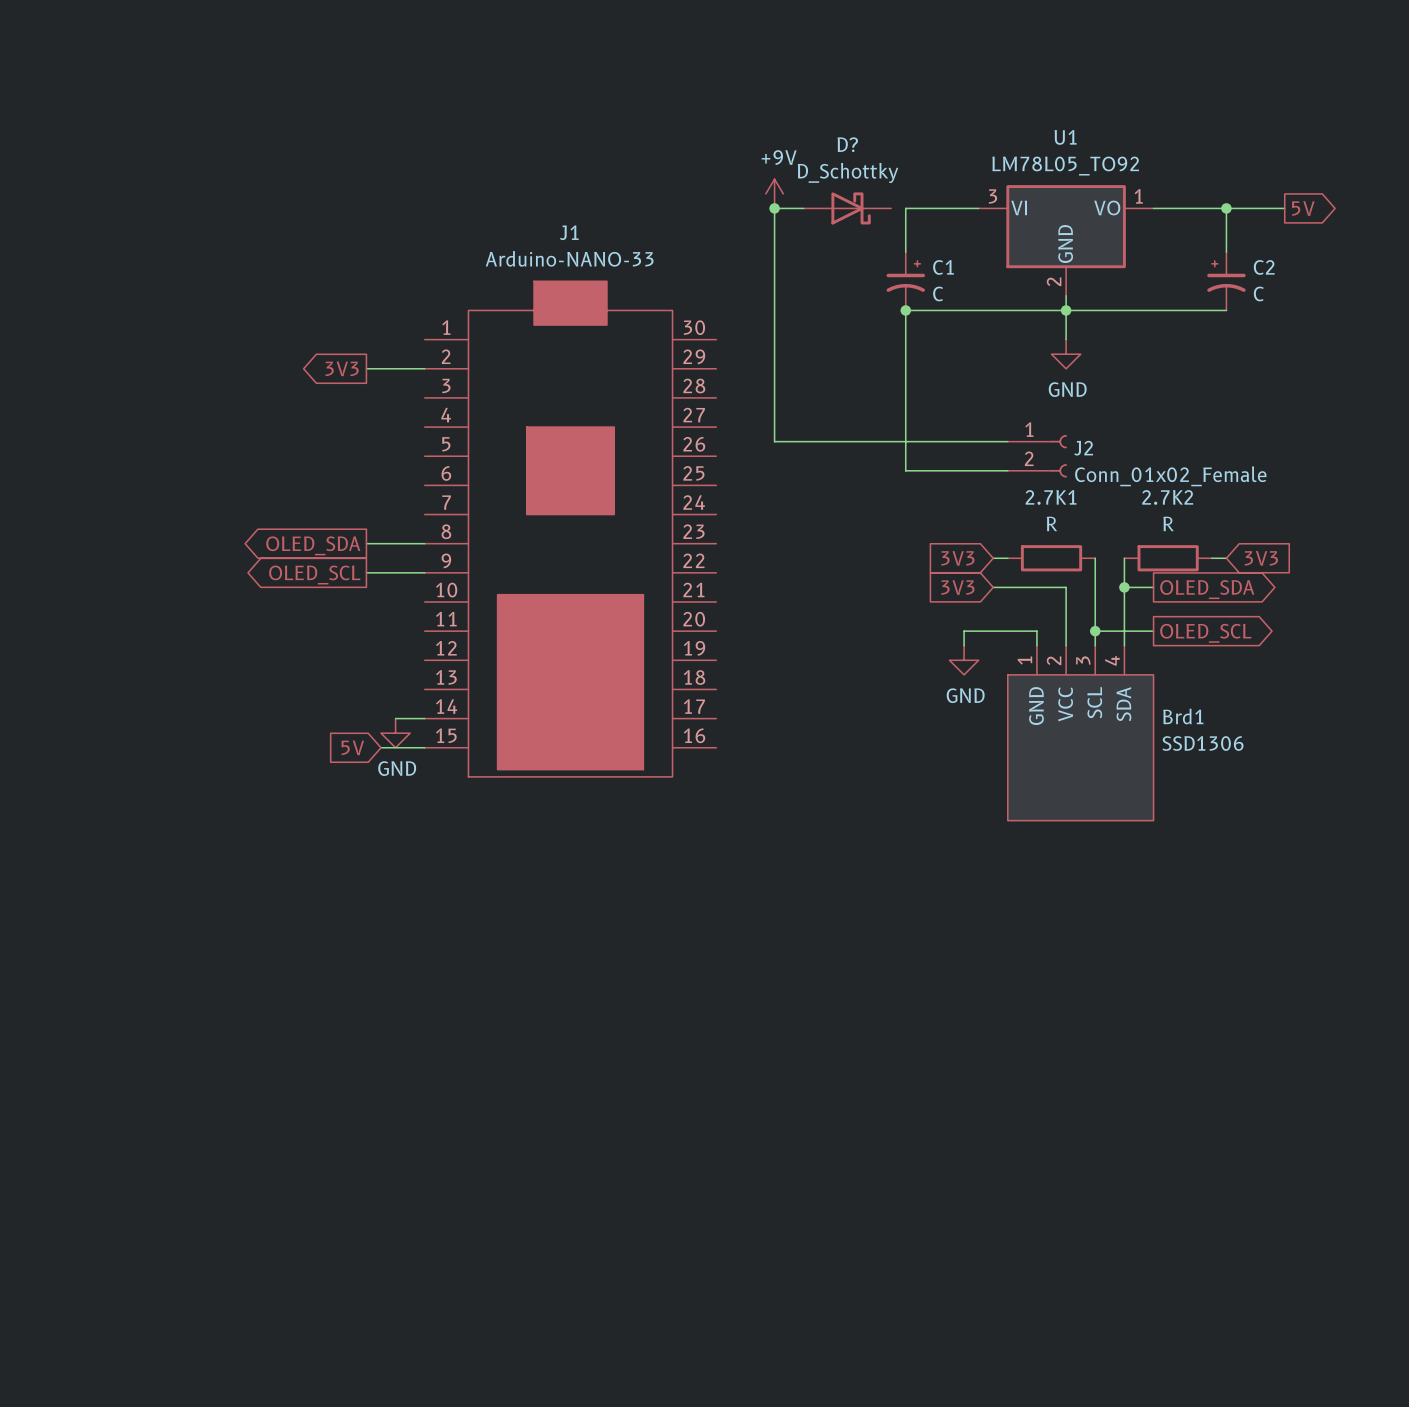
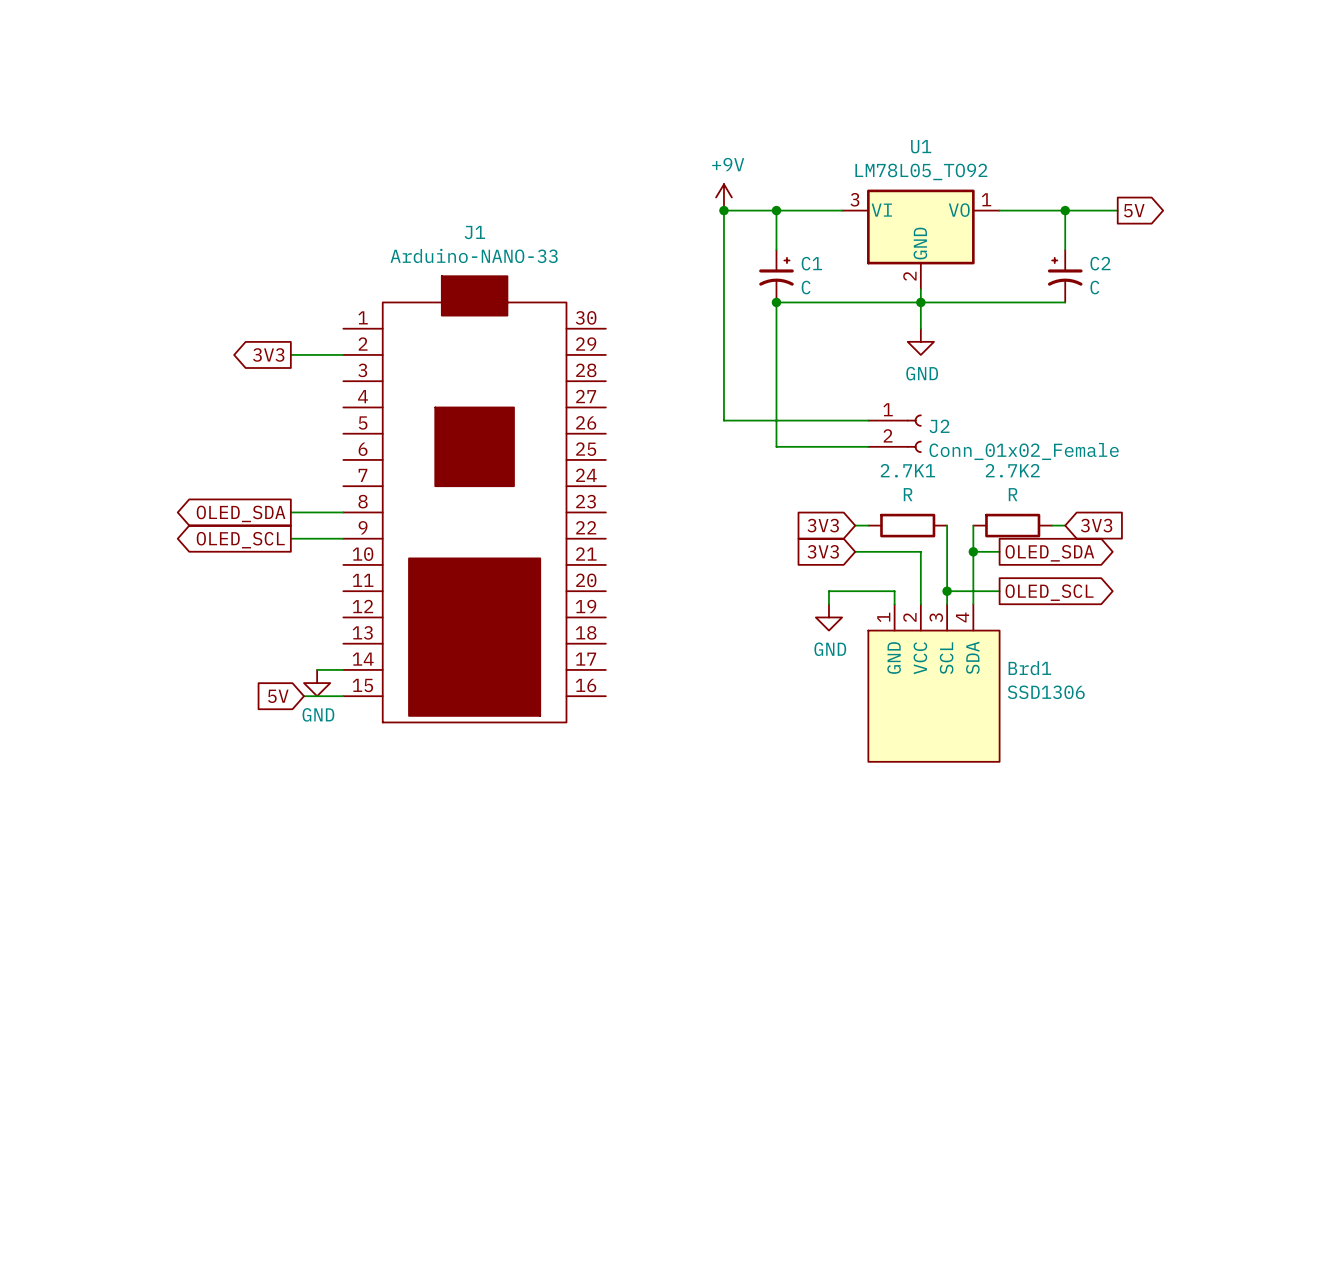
power symbol position: +9V (774, 193) -> +9V (723, 197)
junction: (774, 208) -> none
wire: (803, 208) (774, 208) (774, 441) (847, 441) -> (776, 210) (723, 210) (723, 420)
D?: D_Schottky (847, 208) -> none
junction: none -> (723, 210)
junction: none -> (776, 210)

